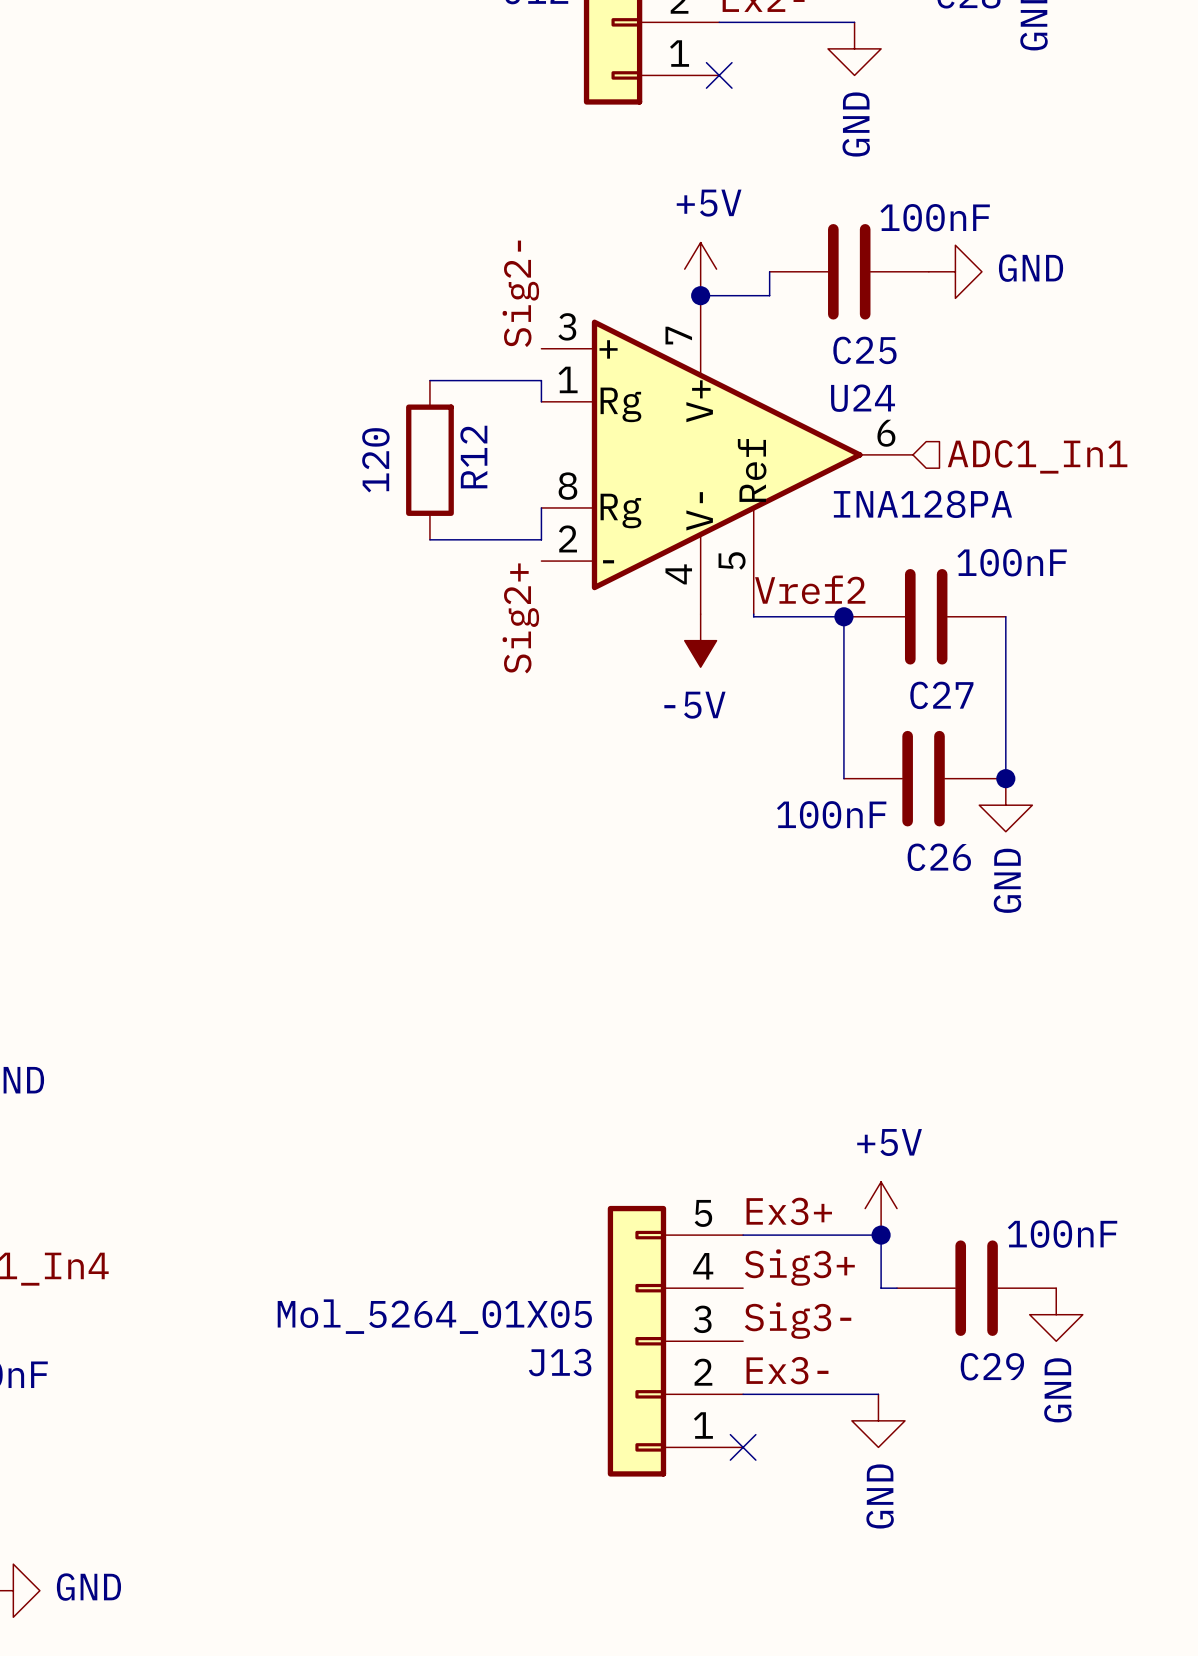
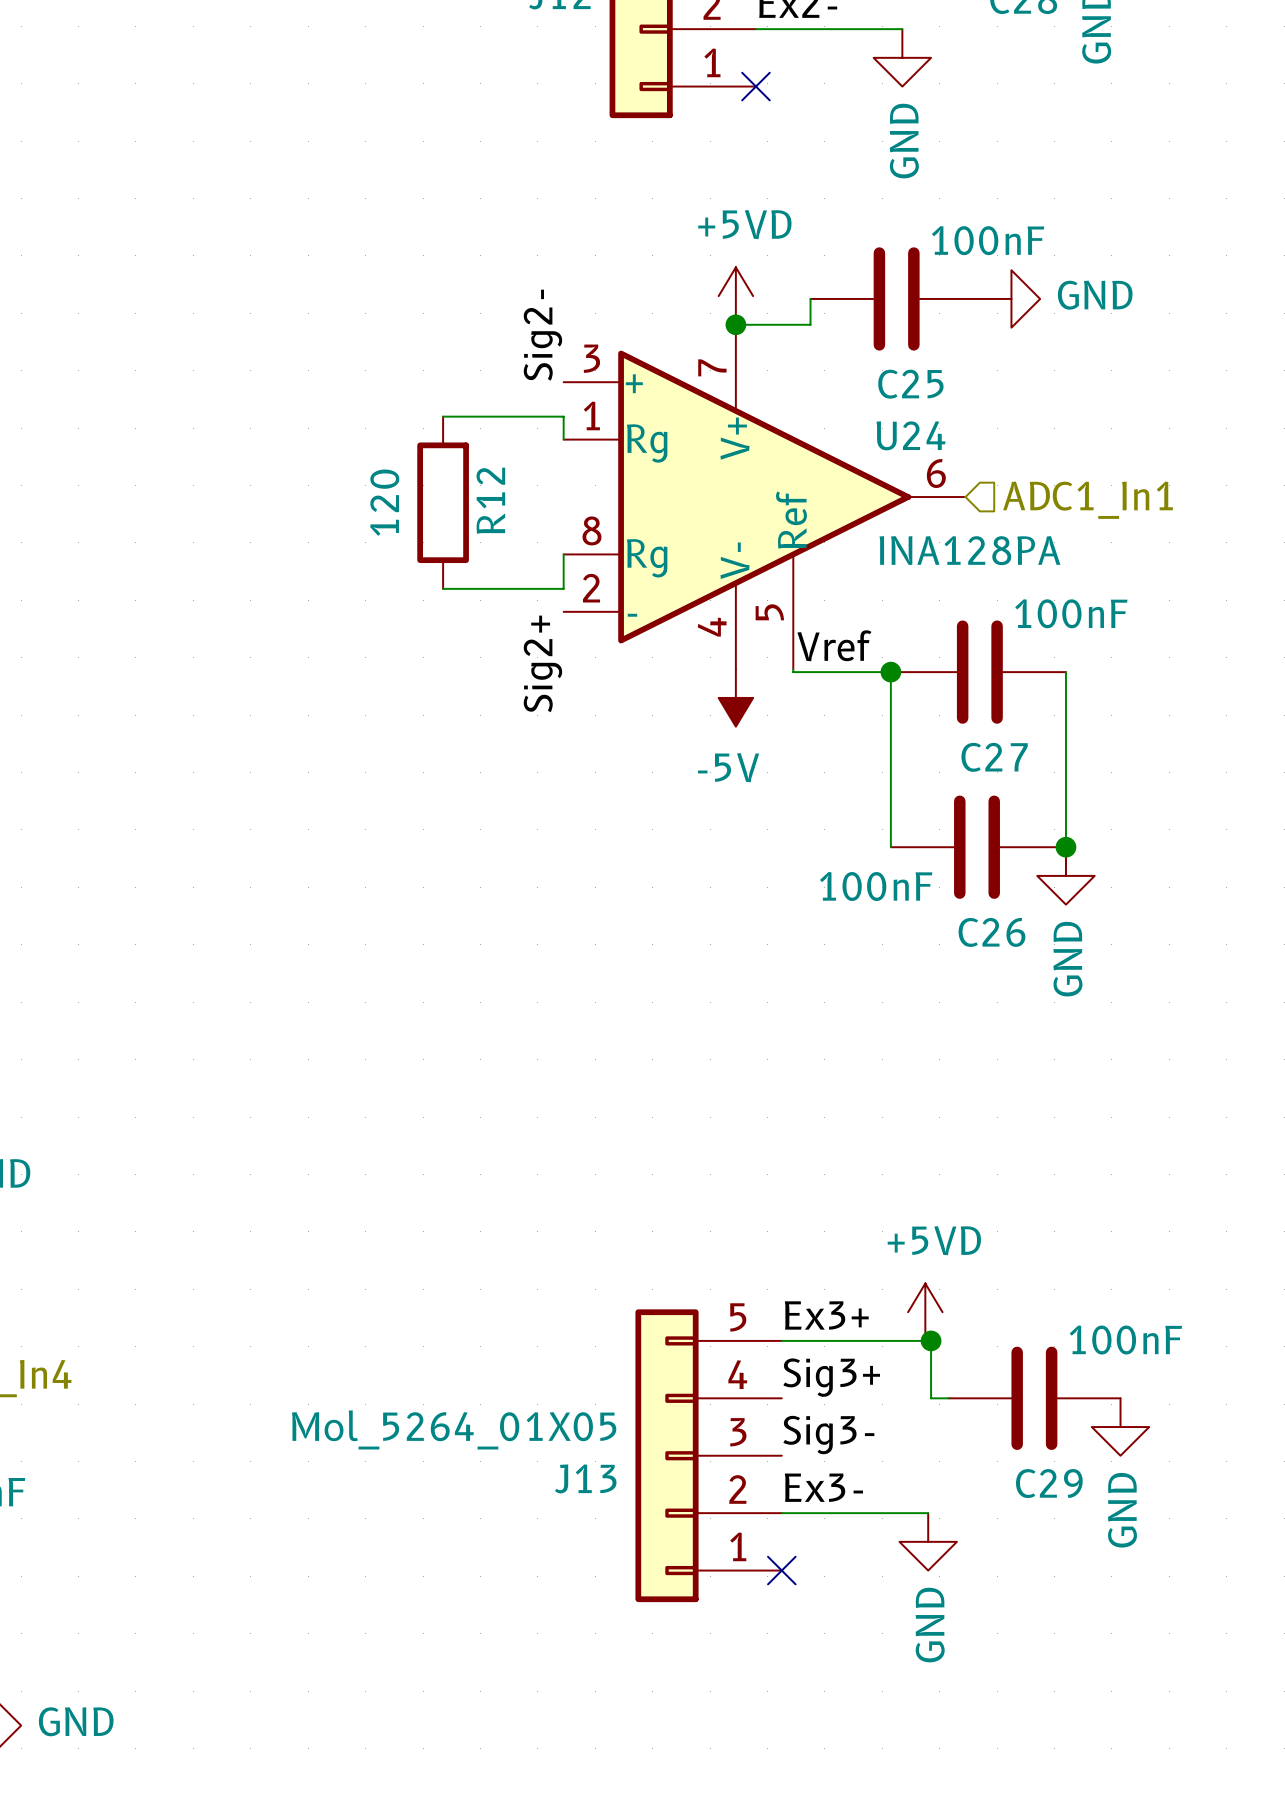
power symbol: +5V (700, 269) -> +5VD (735, 296)
label: Vref2 (810, 589) -> Vref (834, 645)
power symbol: +5V (881, 1208) -> +5VD (925, 1312)

